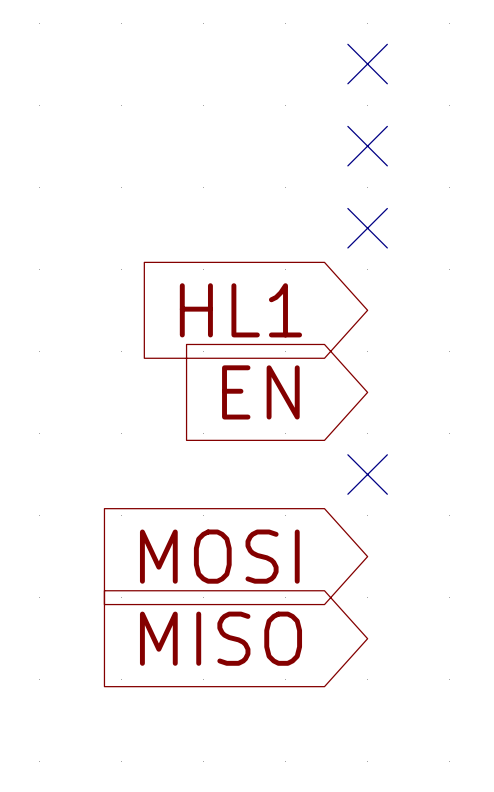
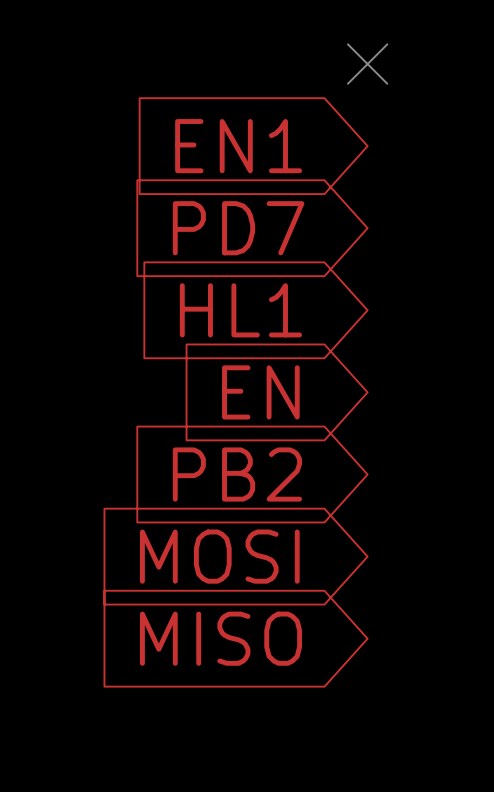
global label: none -> EN1 (238, 146)
no-connect mark: (367, 146) -> none
global label: none -> PD7 (238, 228)
no-connect mark: (367, 228) -> none
global label: none -> PB2 (237, 474)
no-connect mark: (367, 474) -> none

